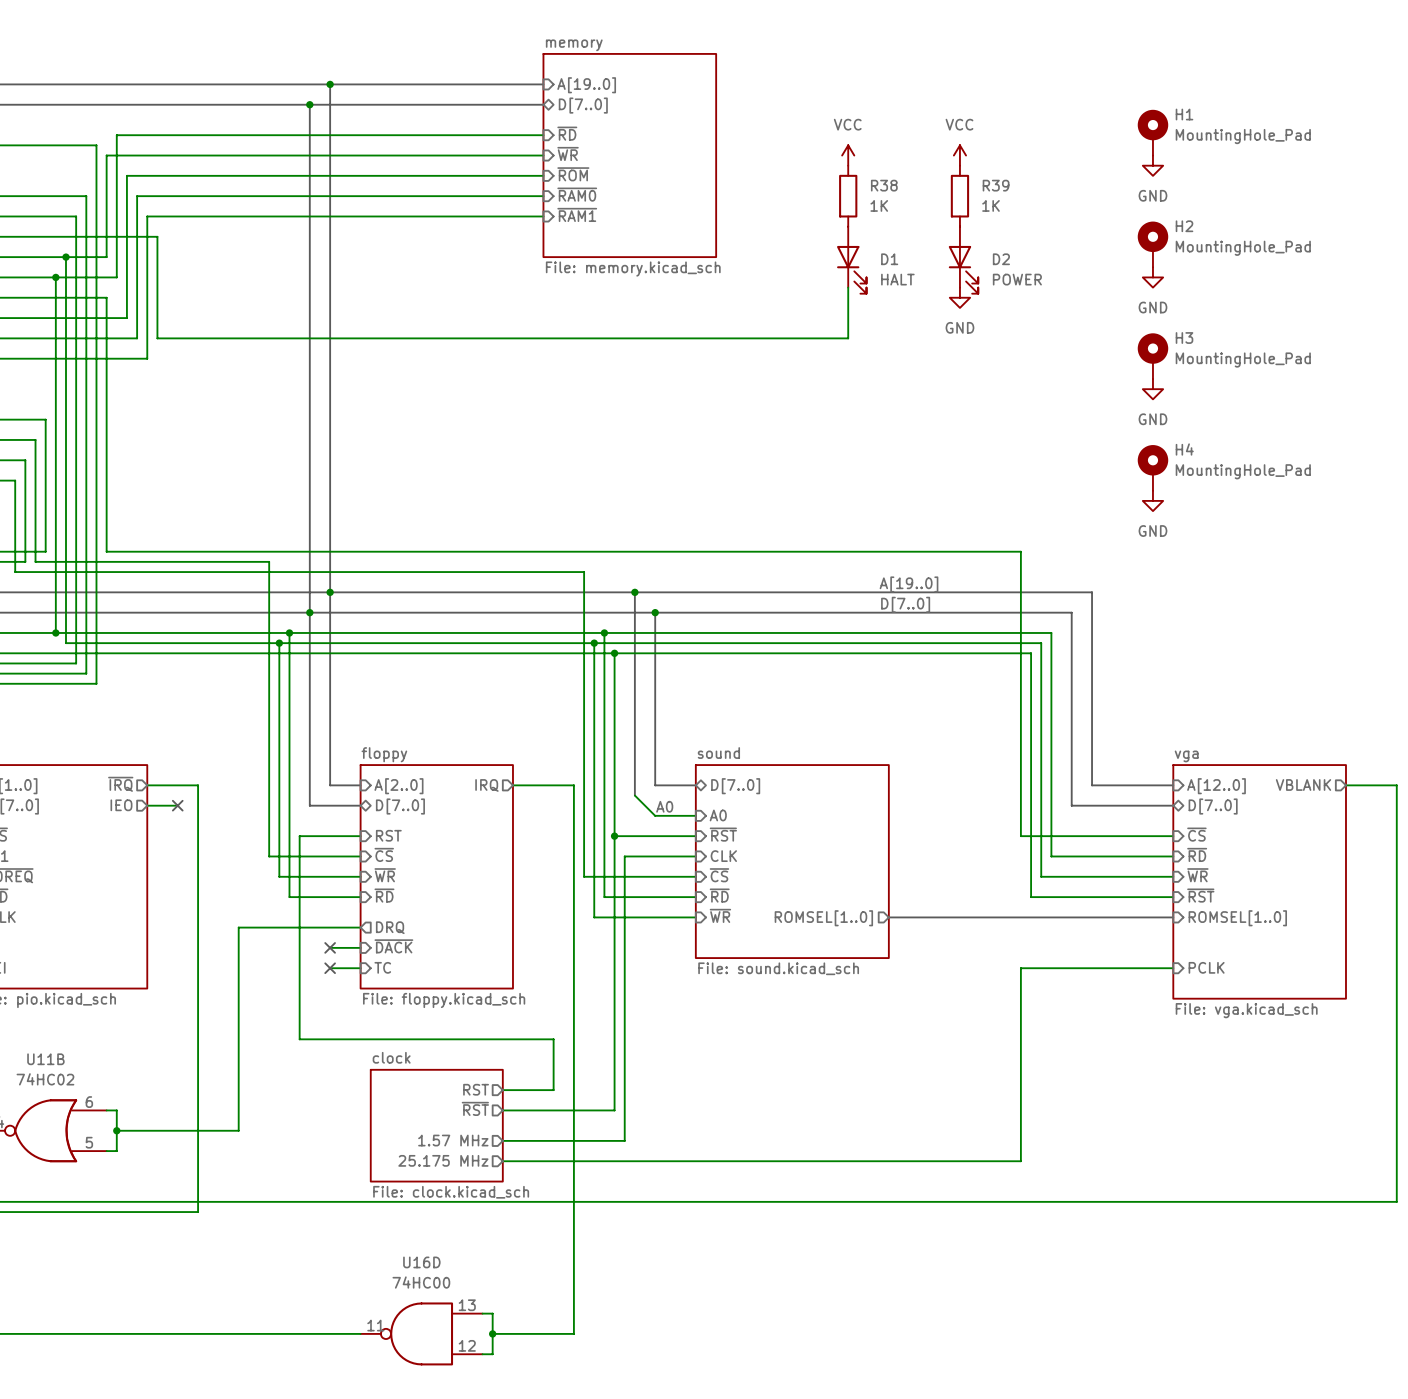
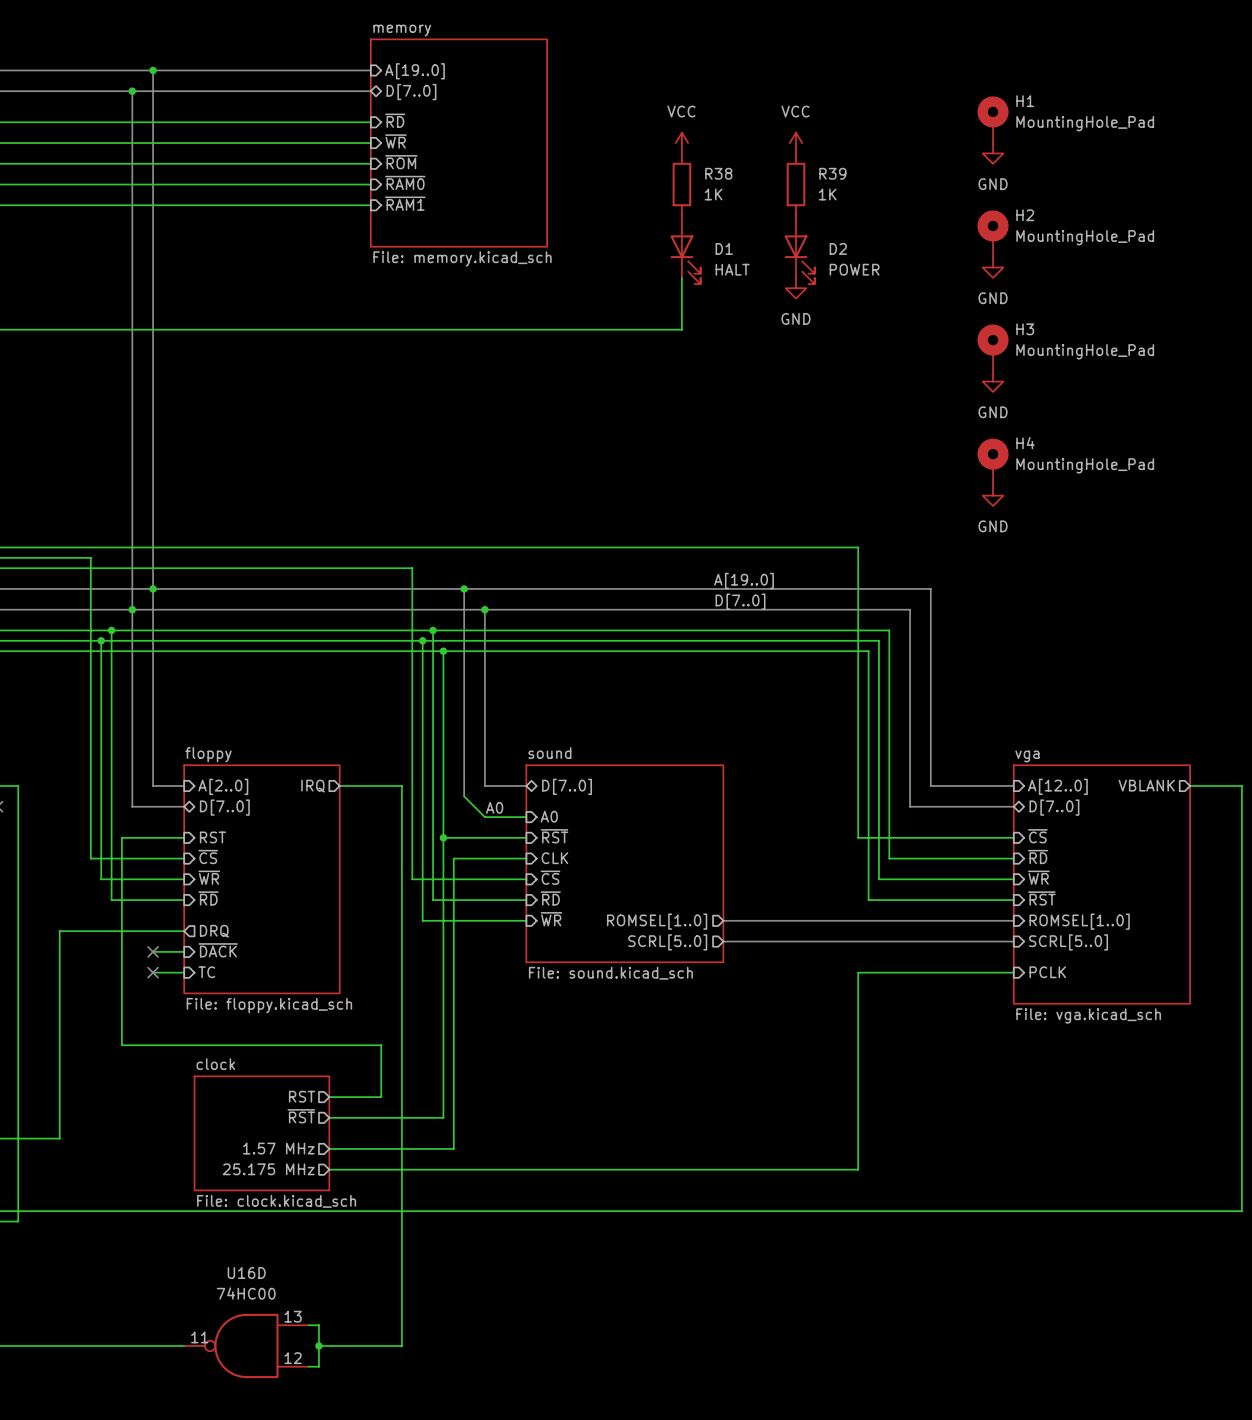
bus: none -> (723, 941) (1013, 941)
sheet pin: none -> SCRL[5..0] (667, 942)
sheet pin: none -> SCRL[5..0] (1068, 942)

